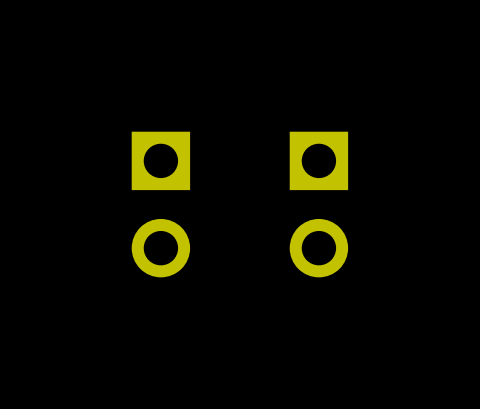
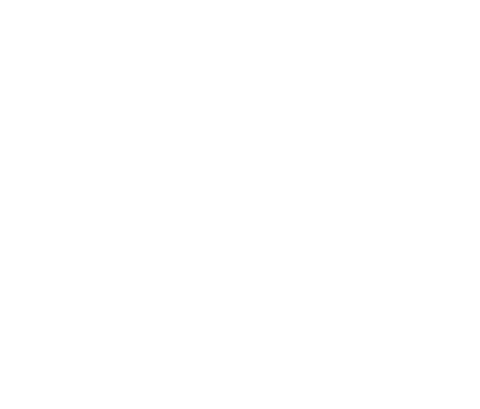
part: (160, 204) -> none
part: (318, 204) -> none

